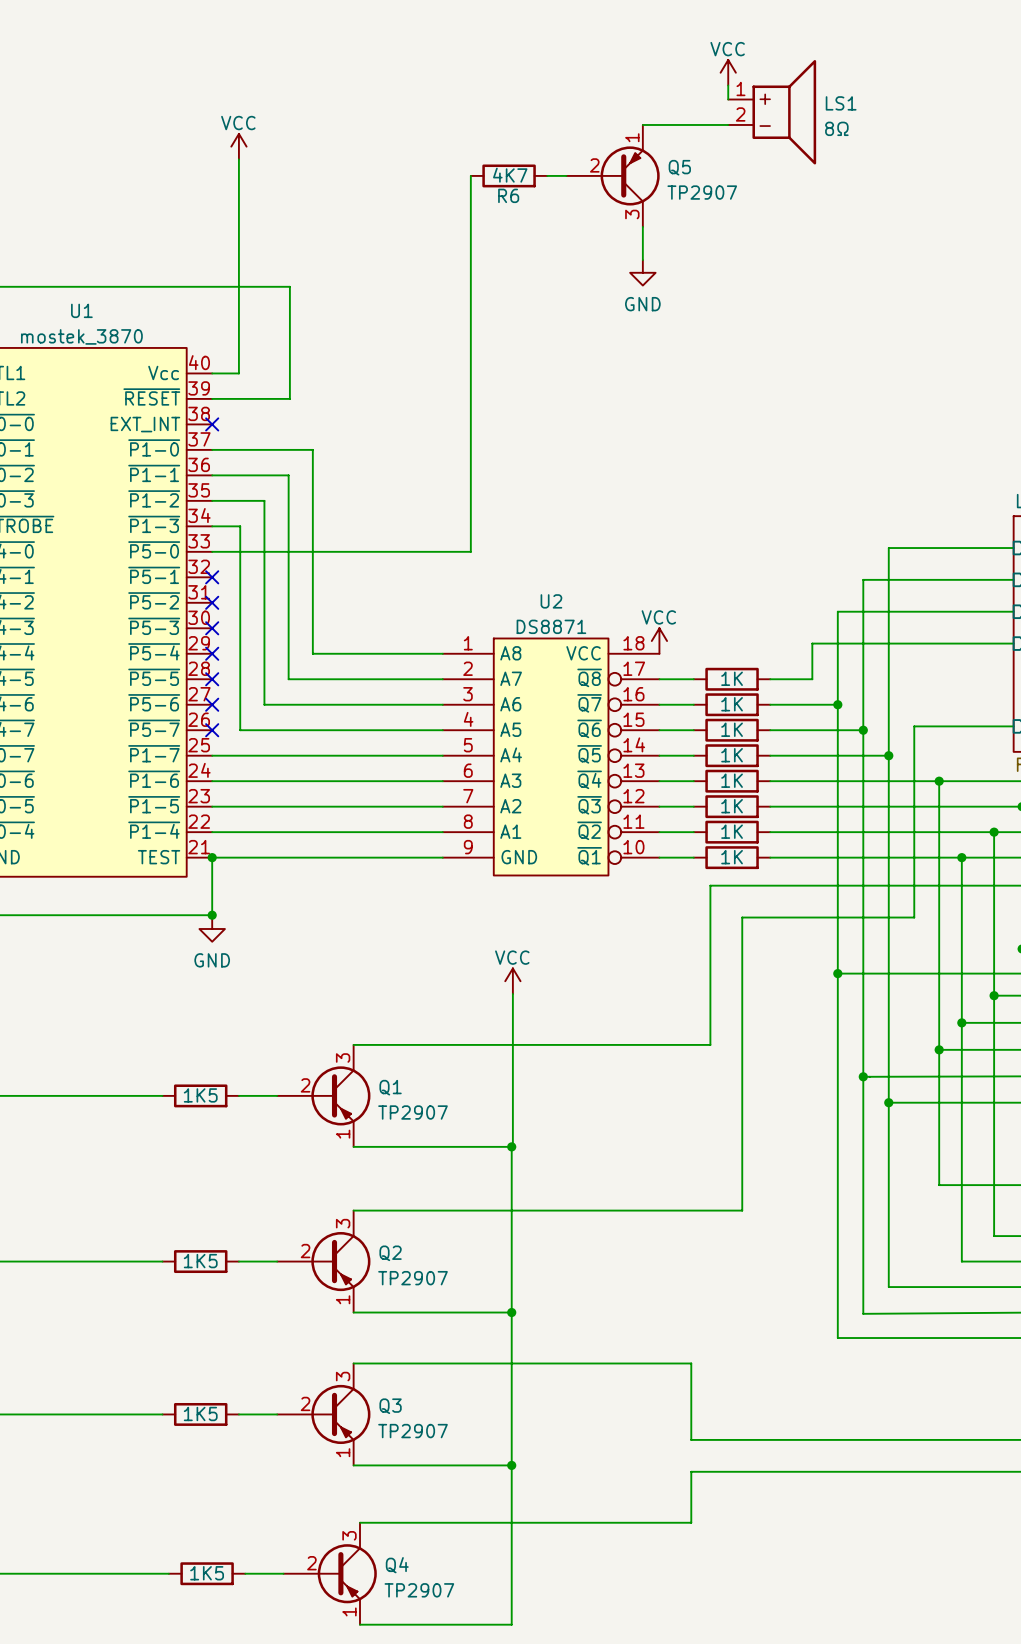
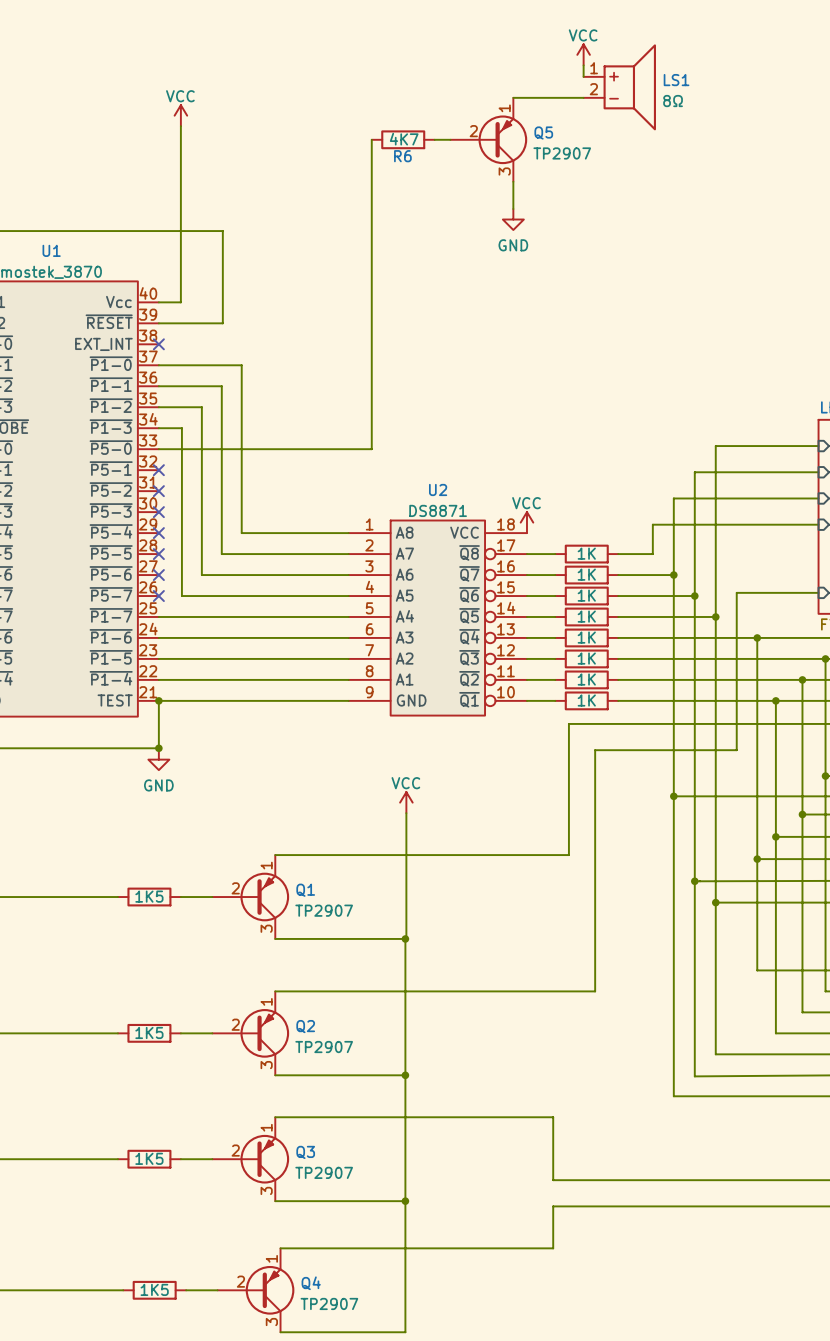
Q1 flip: as is (340, 1095) -> up-down (264, 897)
Q2 flip: as is (340, 1261) -> up-down (264, 1033)
Q3 flip: as is (340, 1414) -> up-down (264, 1159)
Q4 flip: as is (347, 1573) -> up-down (270, 1290)

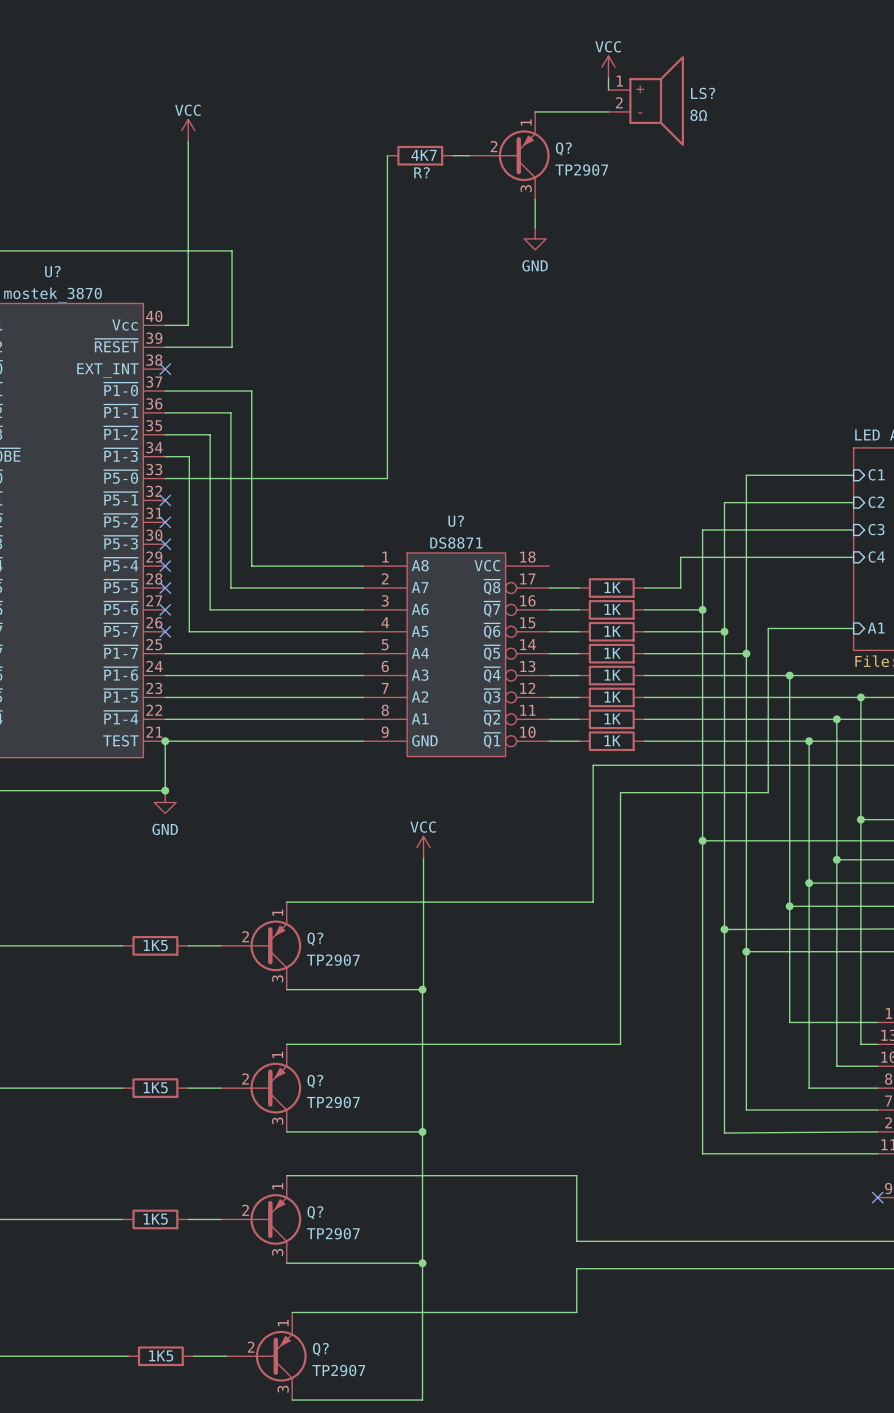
LS1 name: LS1 (676, 80) -> LS? (703, 93)
Q5 name: Q5 (543, 133) -> Q? (563, 149)
R6 name: R6 (402, 156) -> R? (421, 172)
U1 name: U1 (51, 250) -> U? (52, 271)
U2 name: U2 (438, 489) -> U? (456, 521)
power symbol: VCC (526, 522) -> none
Q1 name: Q1 (305, 890) -> Q? (315, 939)
Q2 name: Q2 (305, 1026) -> Q? (315, 1081)
Q3 name: Q3 (305, 1152) -> Q? (315, 1212)
Q4 name: Q4 (311, 1283) -> Q? (320, 1349)

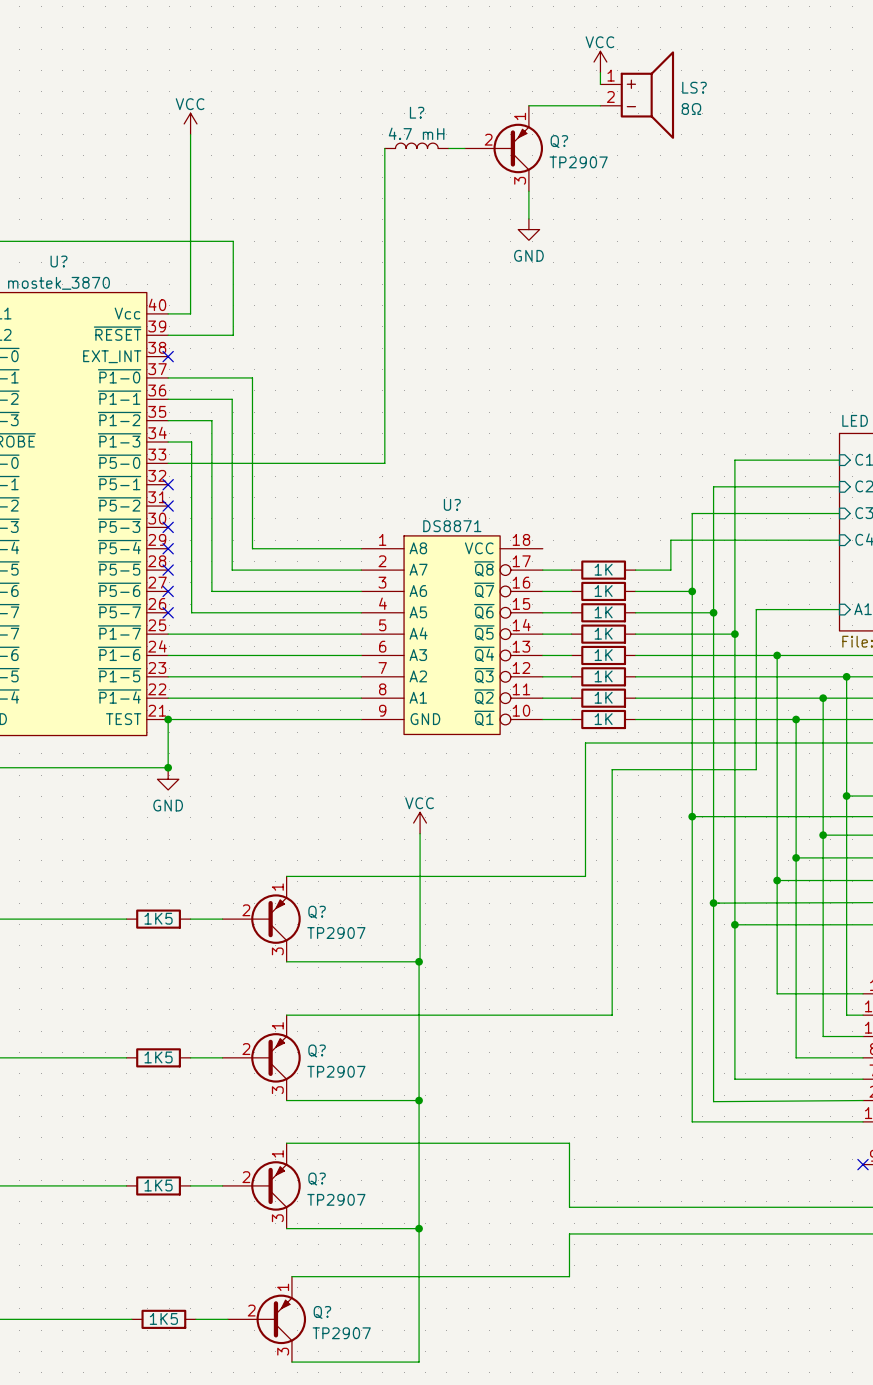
L?: none -> 4.7 mH (416, 145)
R?: 4K7 (420, 155) -> none

